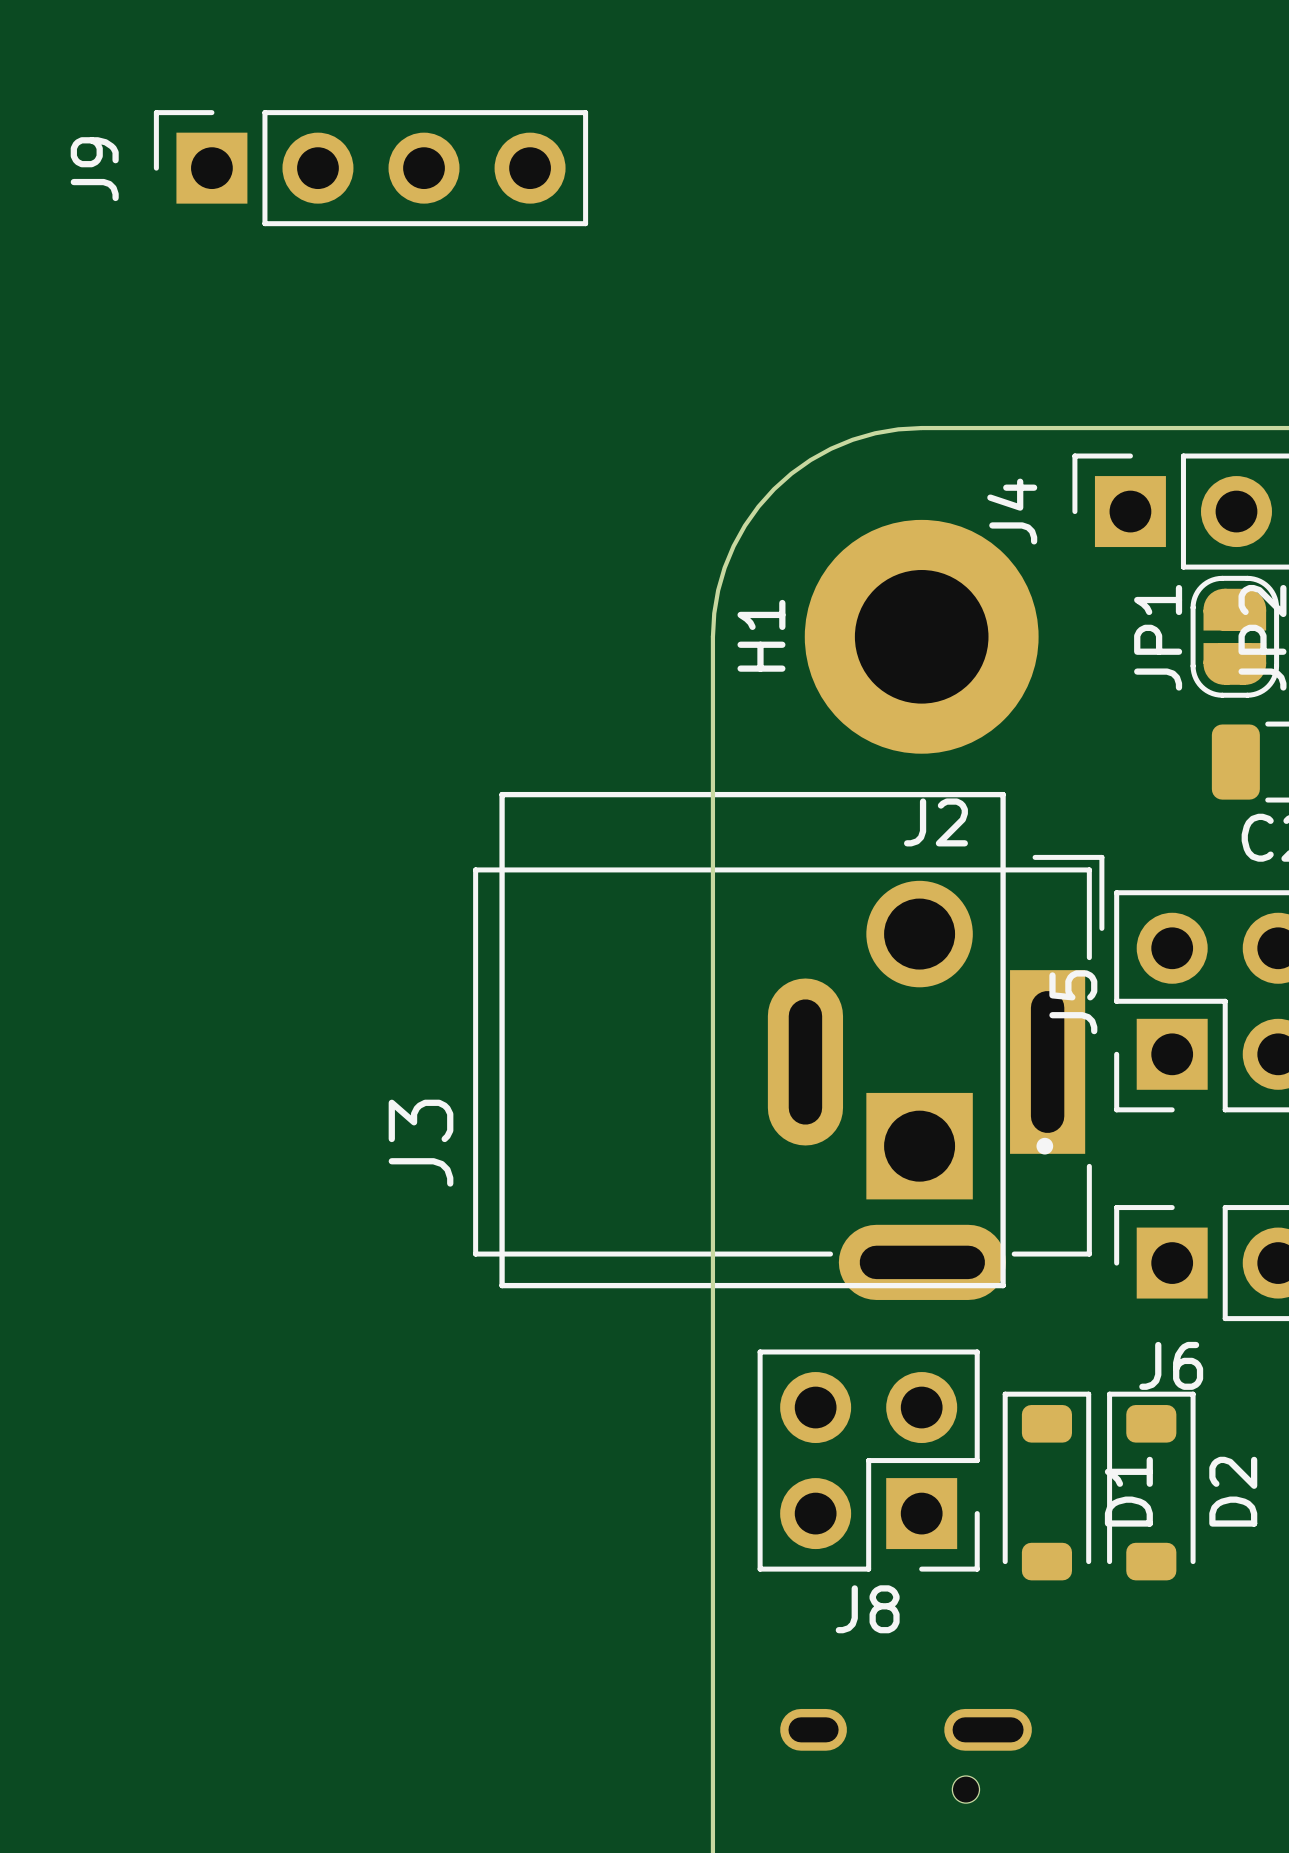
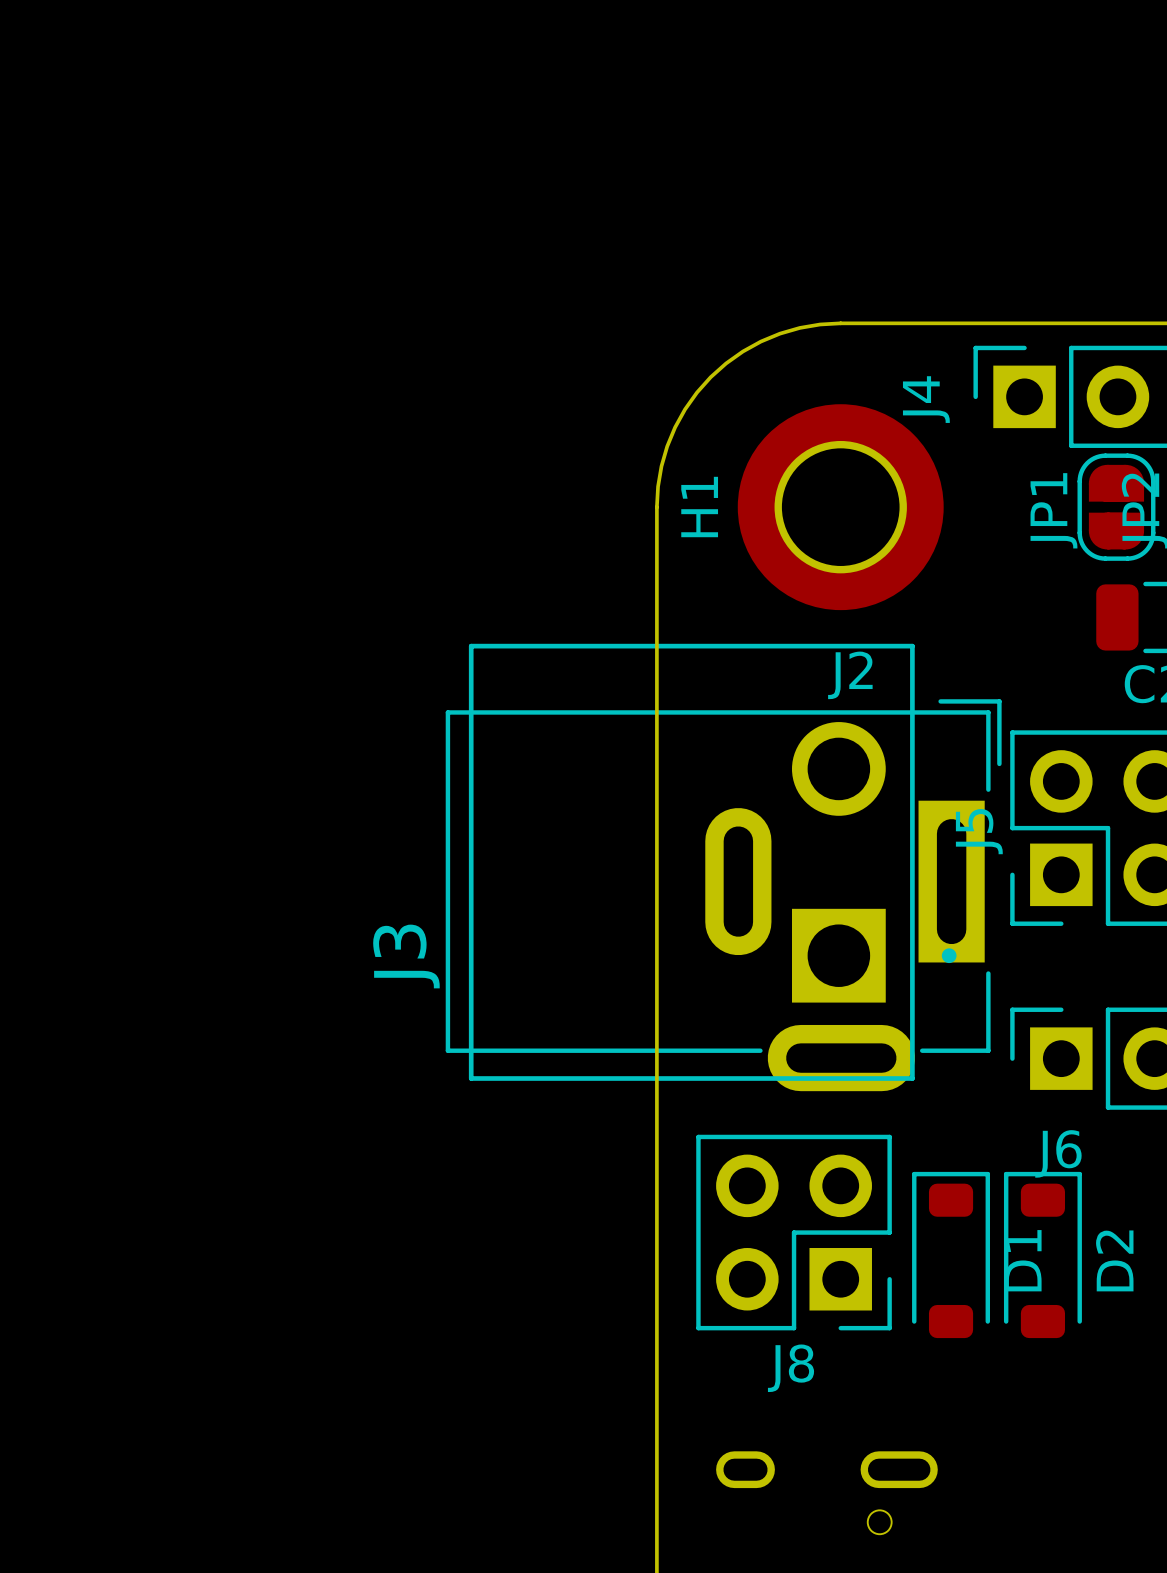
J9: (370, 168) -> none

